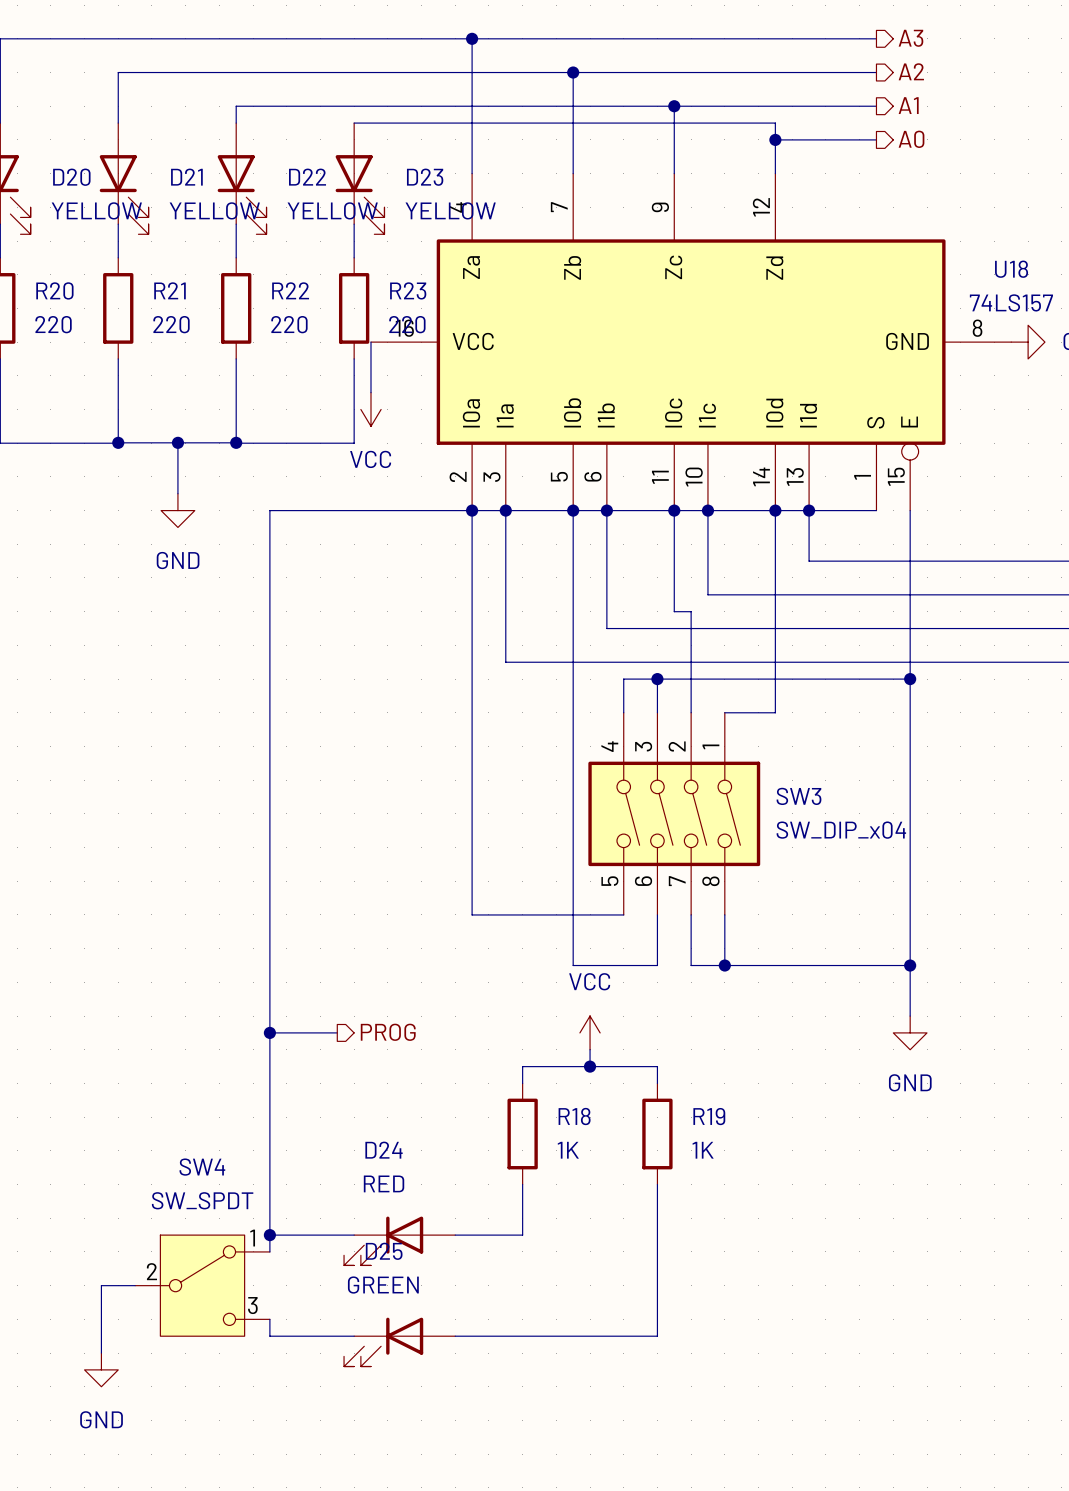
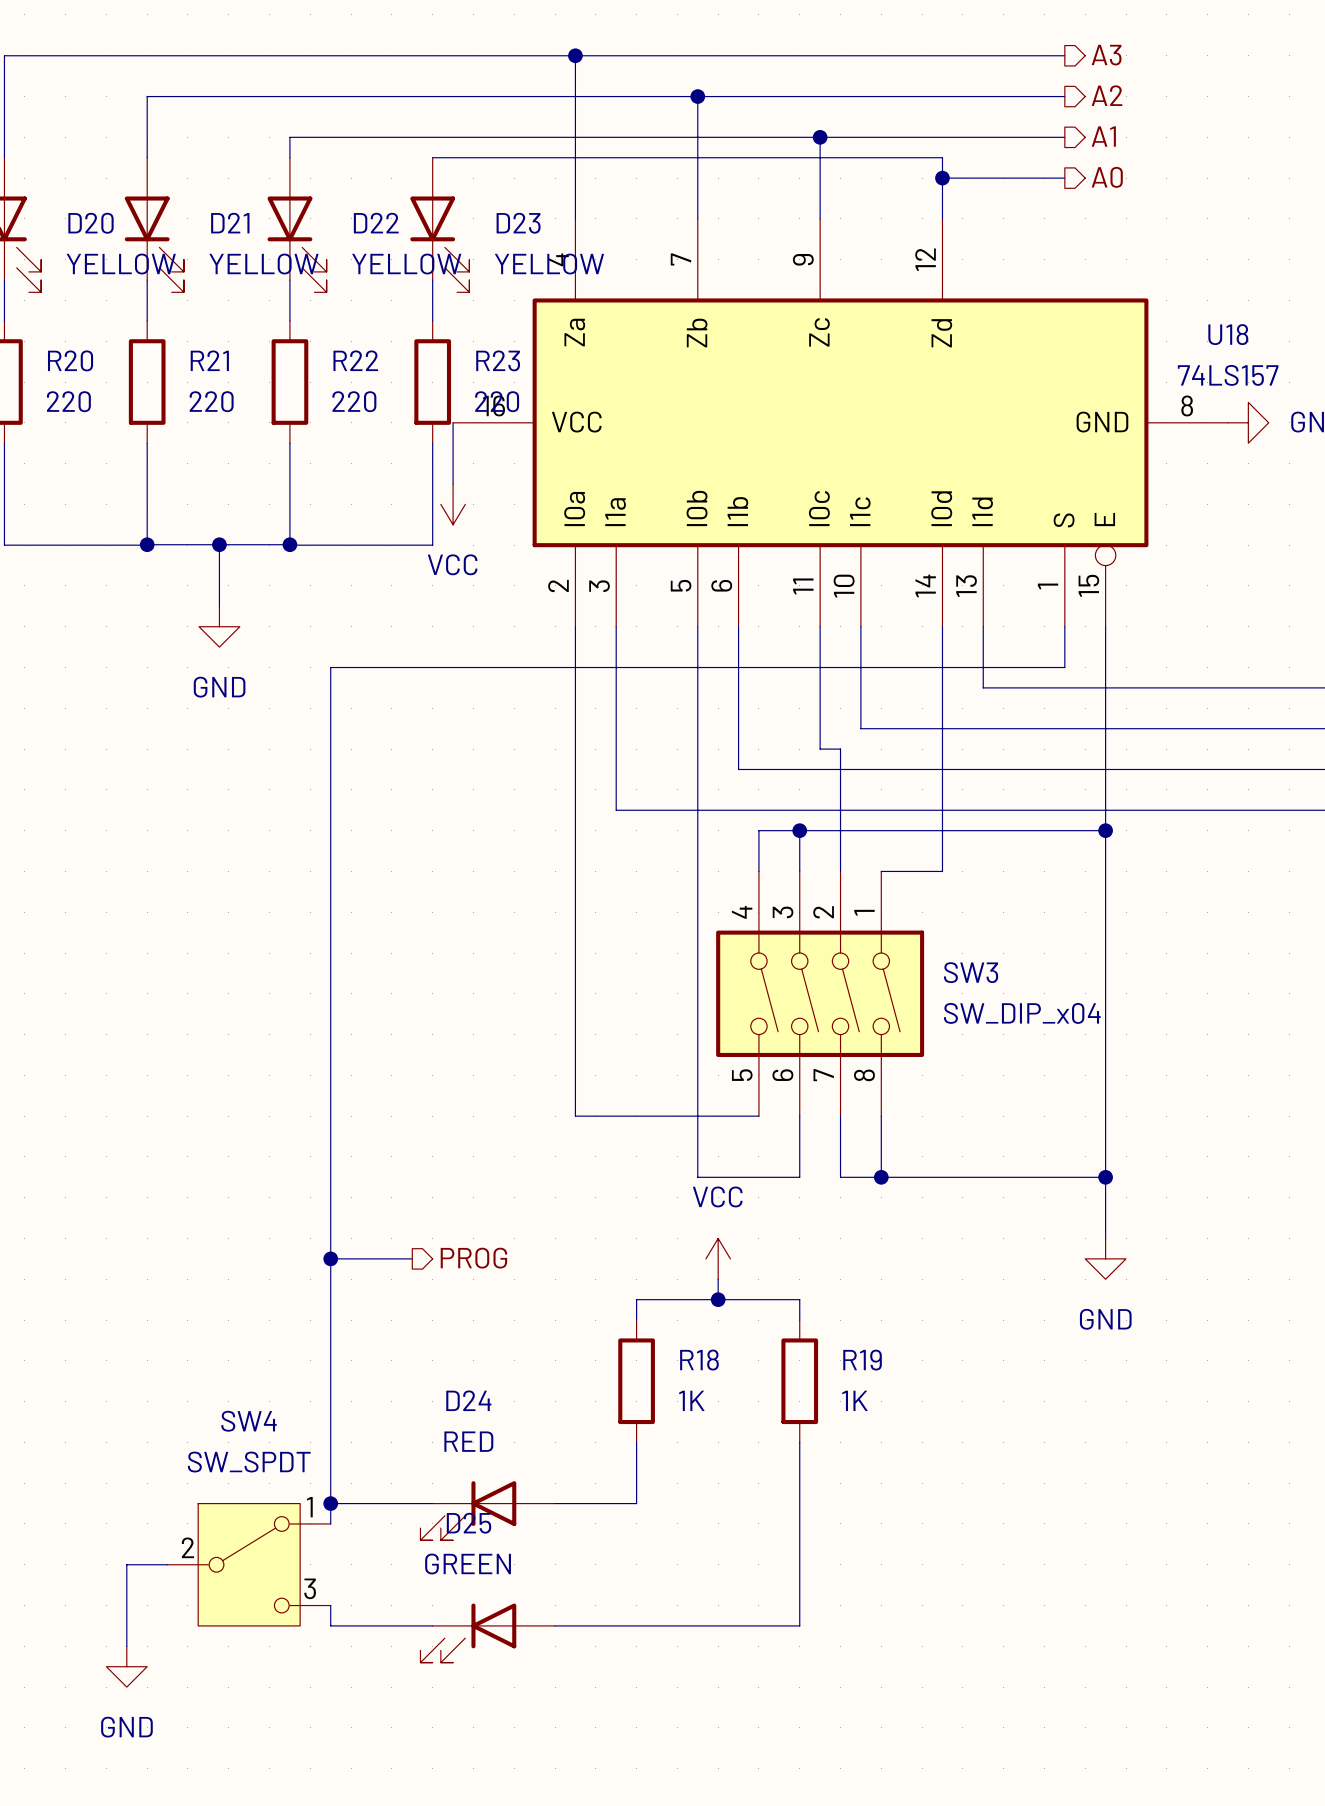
junction: (472, 510) -> none
junction: (505, 510) -> none
junction: (573, 510) -> none
junction: (606, 510) -> none
junction: (674, 510) -> none
junction: (707, 510) -> none
junction: (775, 510) -> none
junction: (809, 510) -> none
wire: (876, 510) (269, 510) (269, 544) -> (1064, 626) (1064, 667) (330, 667)

